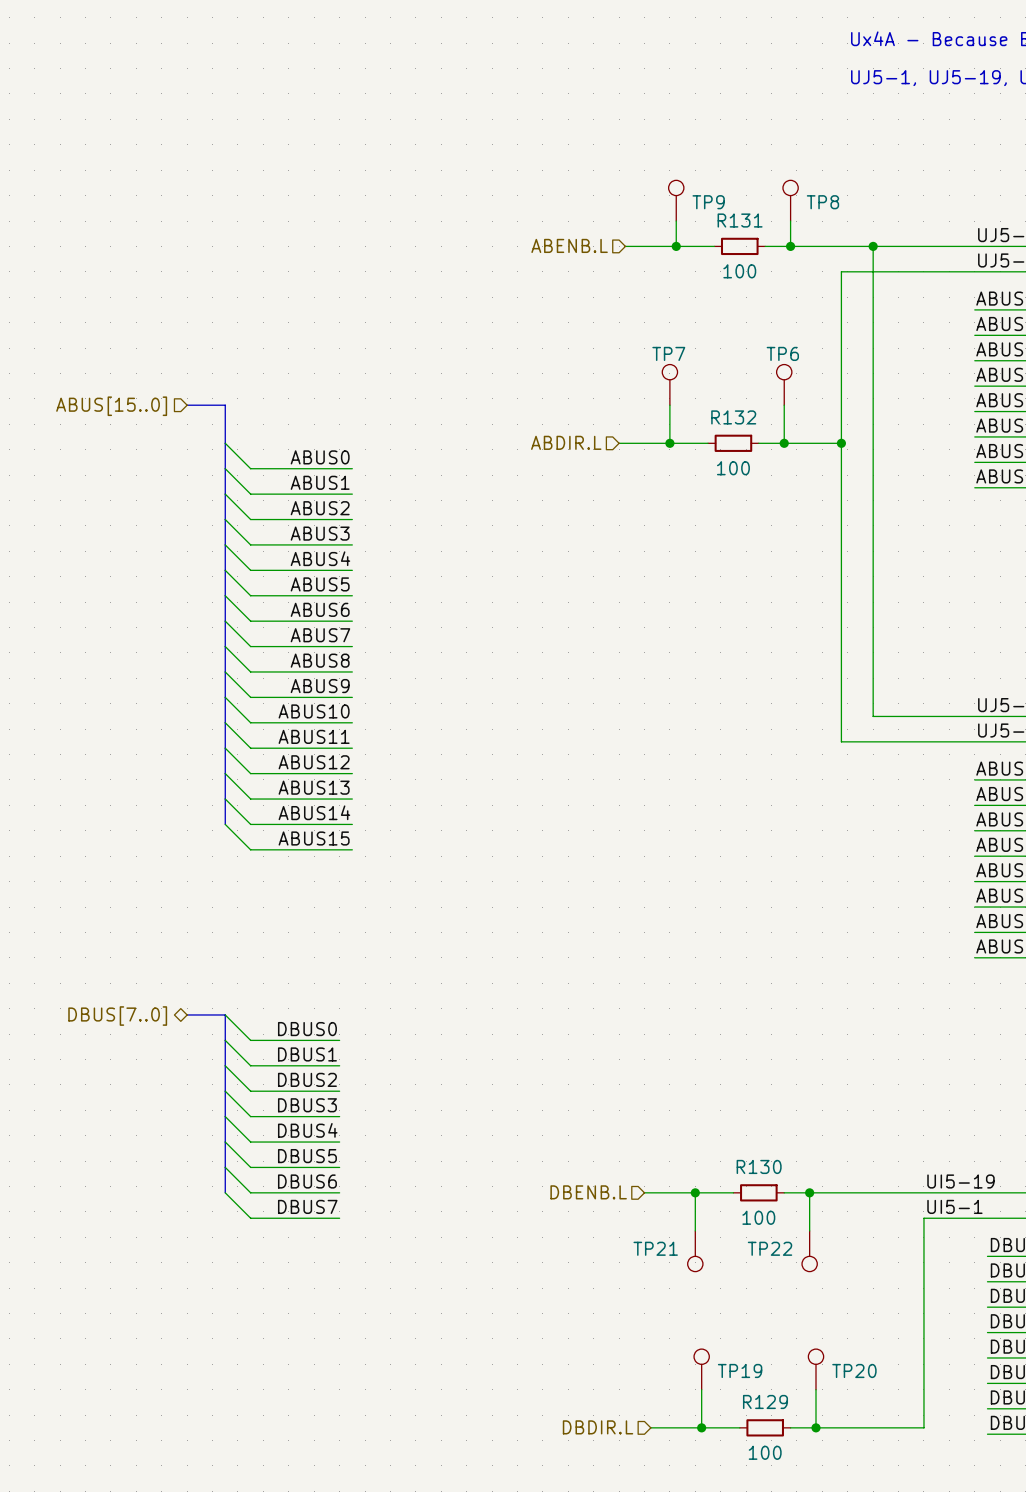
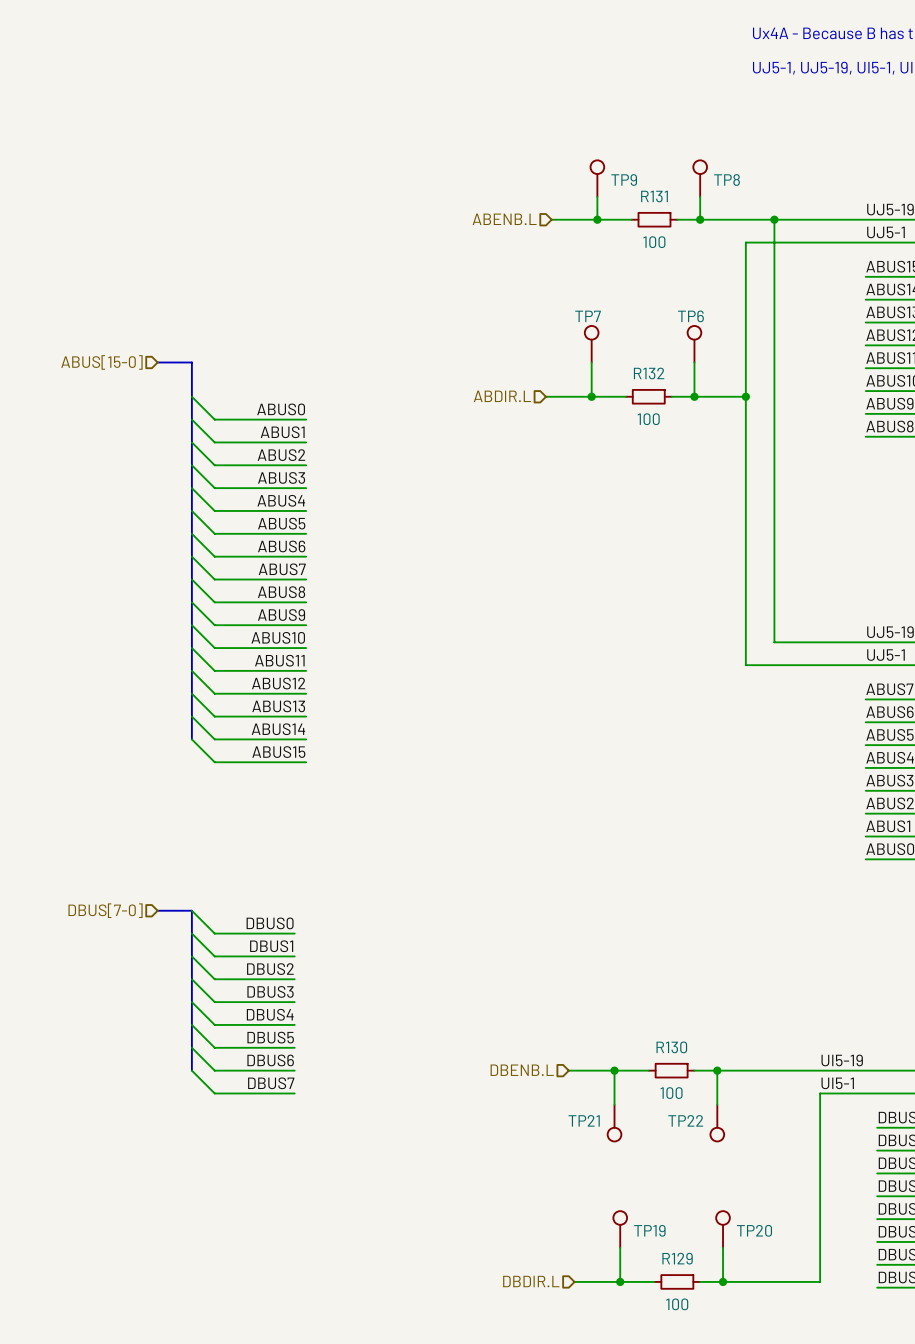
hierarchical label: ABUS[15..0] (111, 406) -> ABUS[15-0] (101, 362)
hierarchical label shape: bidirectional (117, 1016) -> input (105, 910)
hierarchical label: DBUS[7..0] (117, 1016) -> DBUS[7-0] (105, 910)

